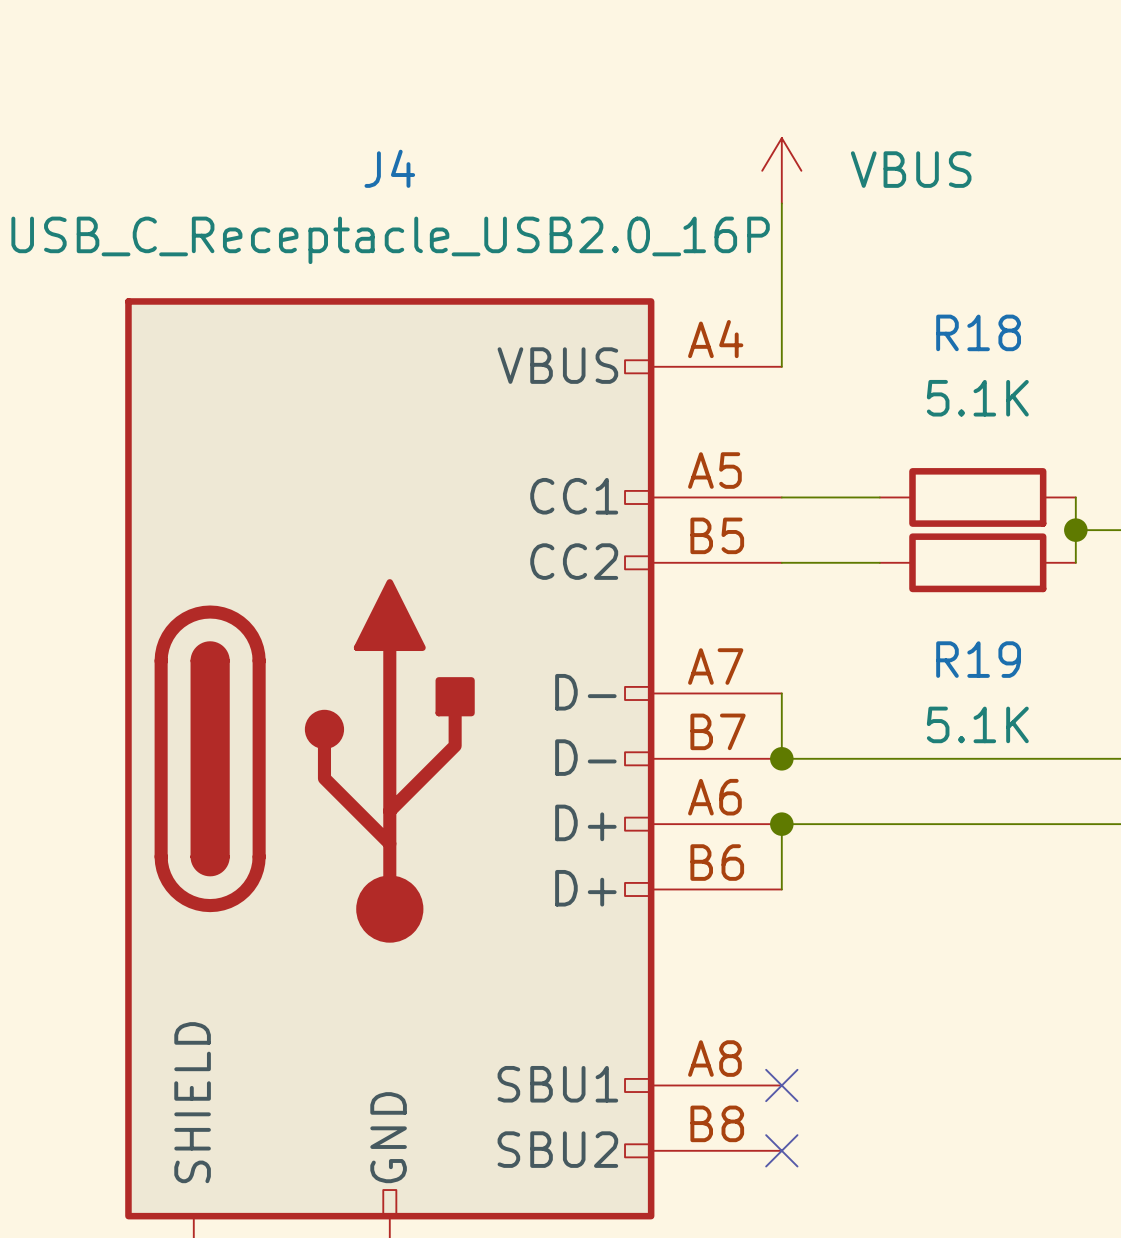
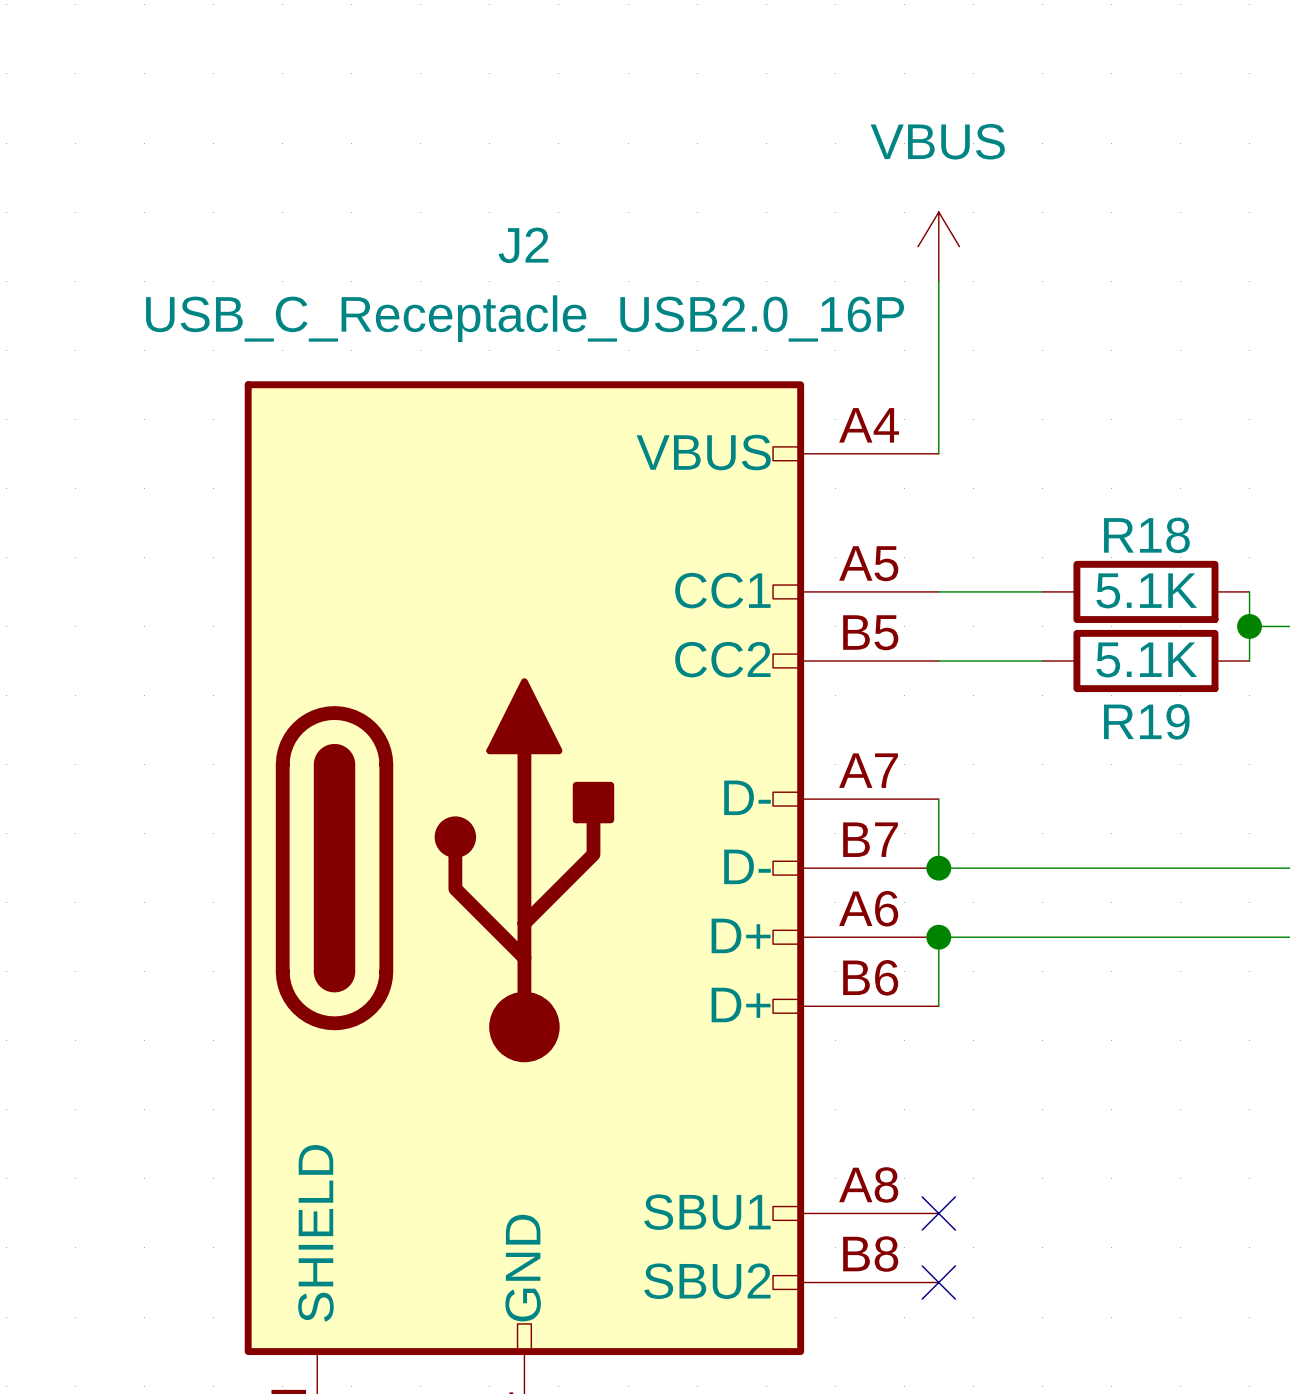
J4 name: J4 (389, 168) -> J2 (523, 245)
power symbol text position: VBUS (911, 169) -> VBUS (937, 141)
R18 name position: R18 (978, 332) -> R18 (1146, 535)
R18 value position: 5.1K (977, 398) -> 5.1K (1146, 590)
R19 name position: R19 (978, 659) -> R19 (1146, 721)
R19 value position: 5.1K (977, 724) -> 5.1K (1146, 659)

